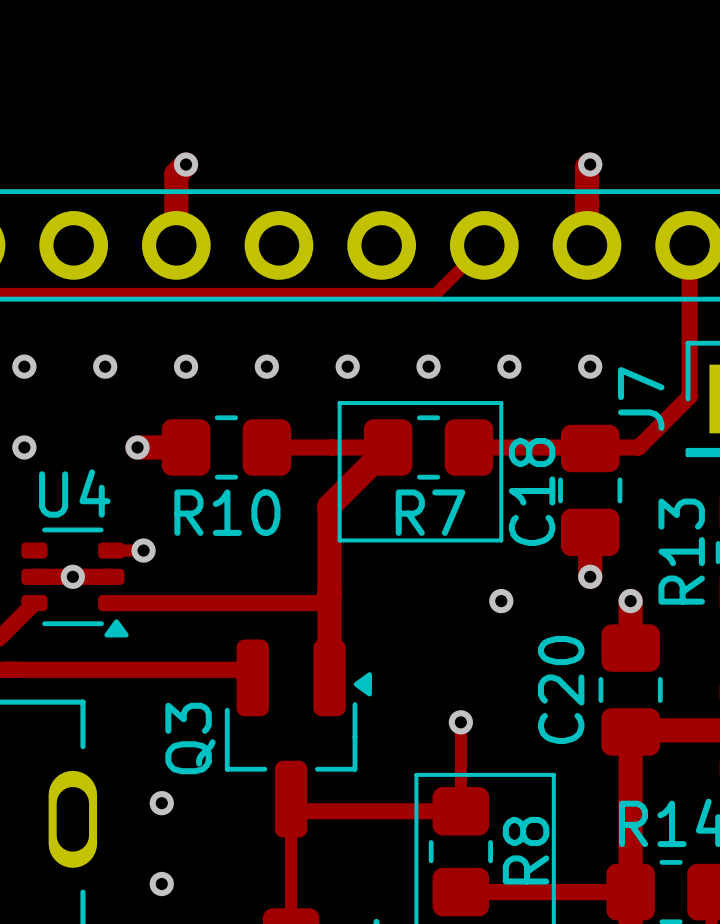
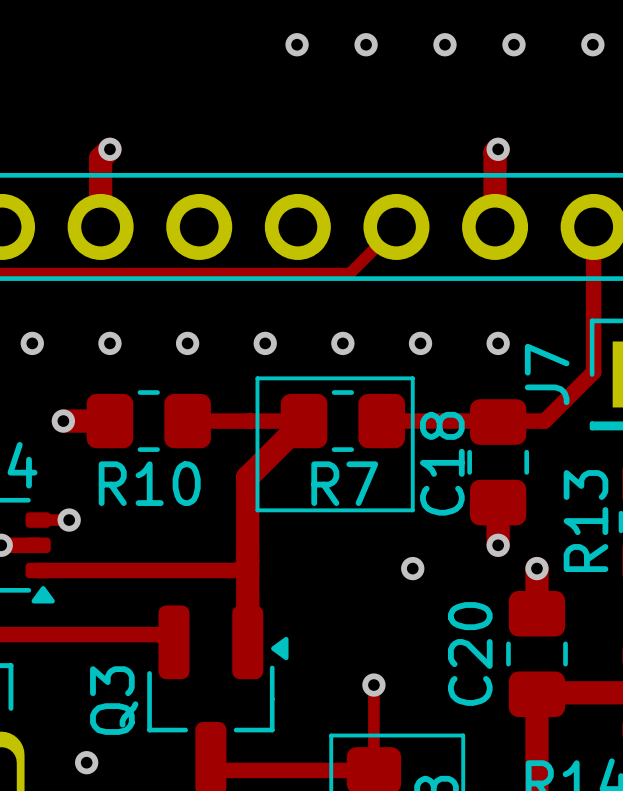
via: none -> (297, 44)
via: none -> (366, 44)
via: none -> (444, 44)
via: none -> (514, 44)
via: none -> (592, 44)

